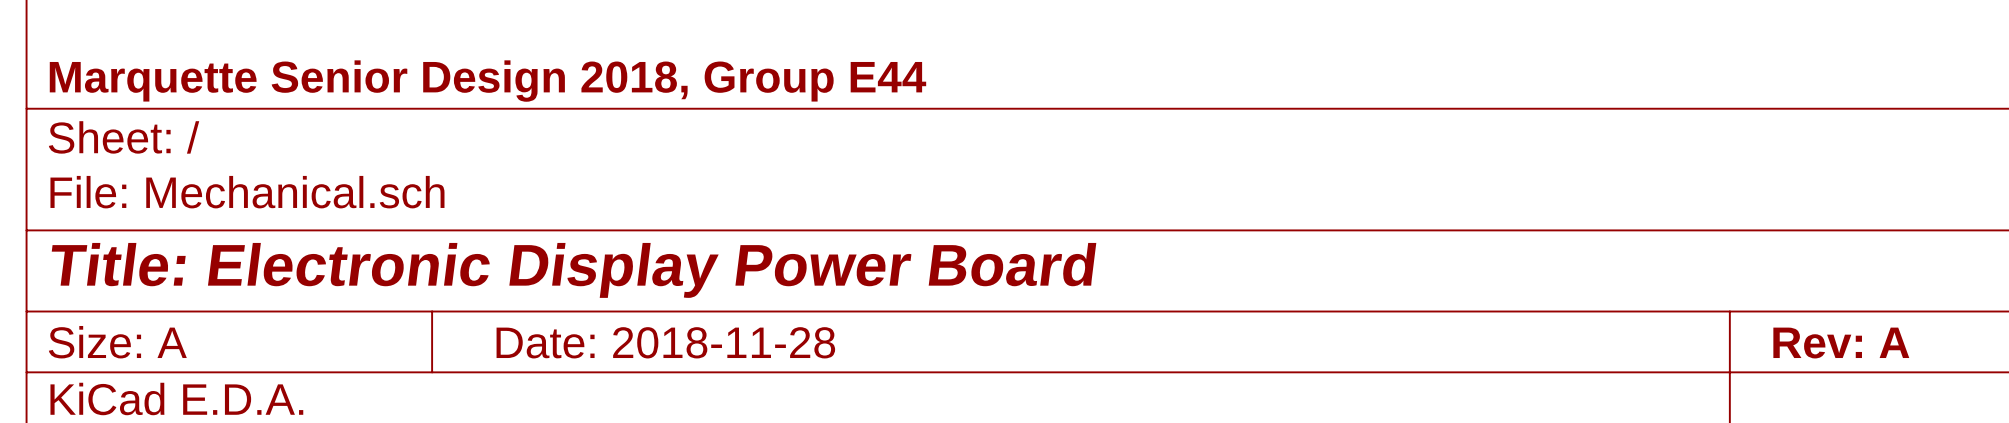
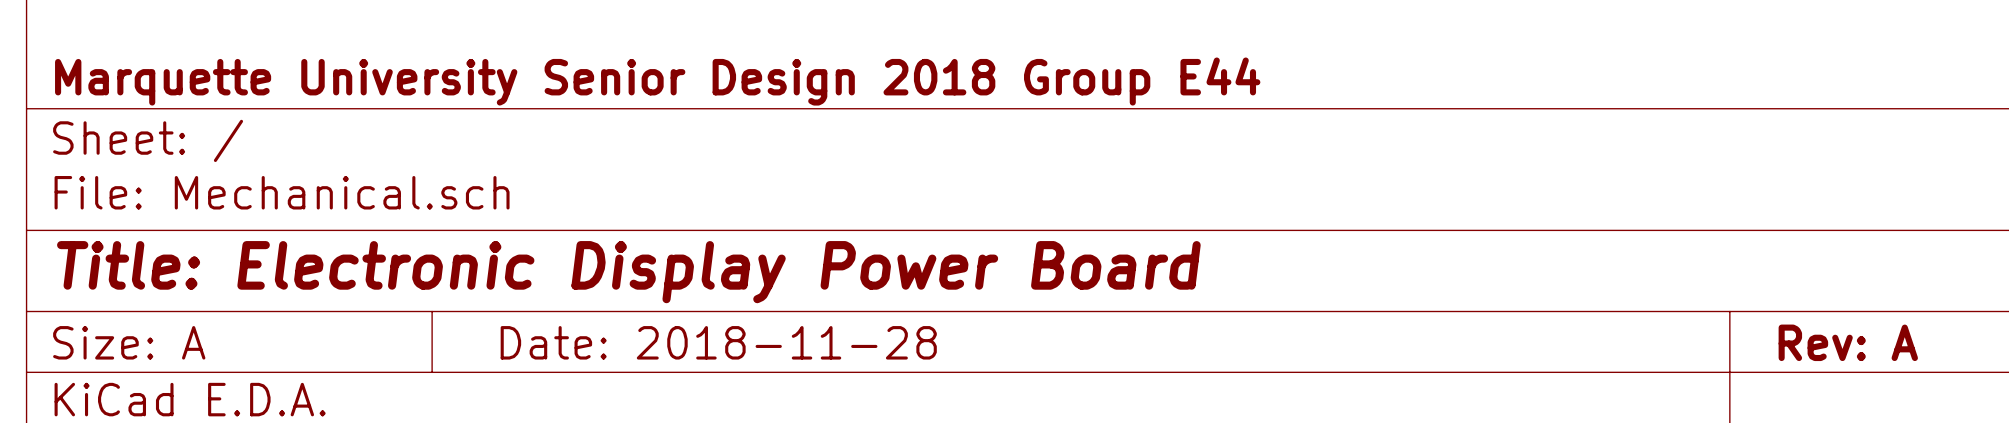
title block: Marquette Senior Design 2018, Group E44 (487, 81) -> Marquette University Senior Design 2018 Group E44 (657, 81)

